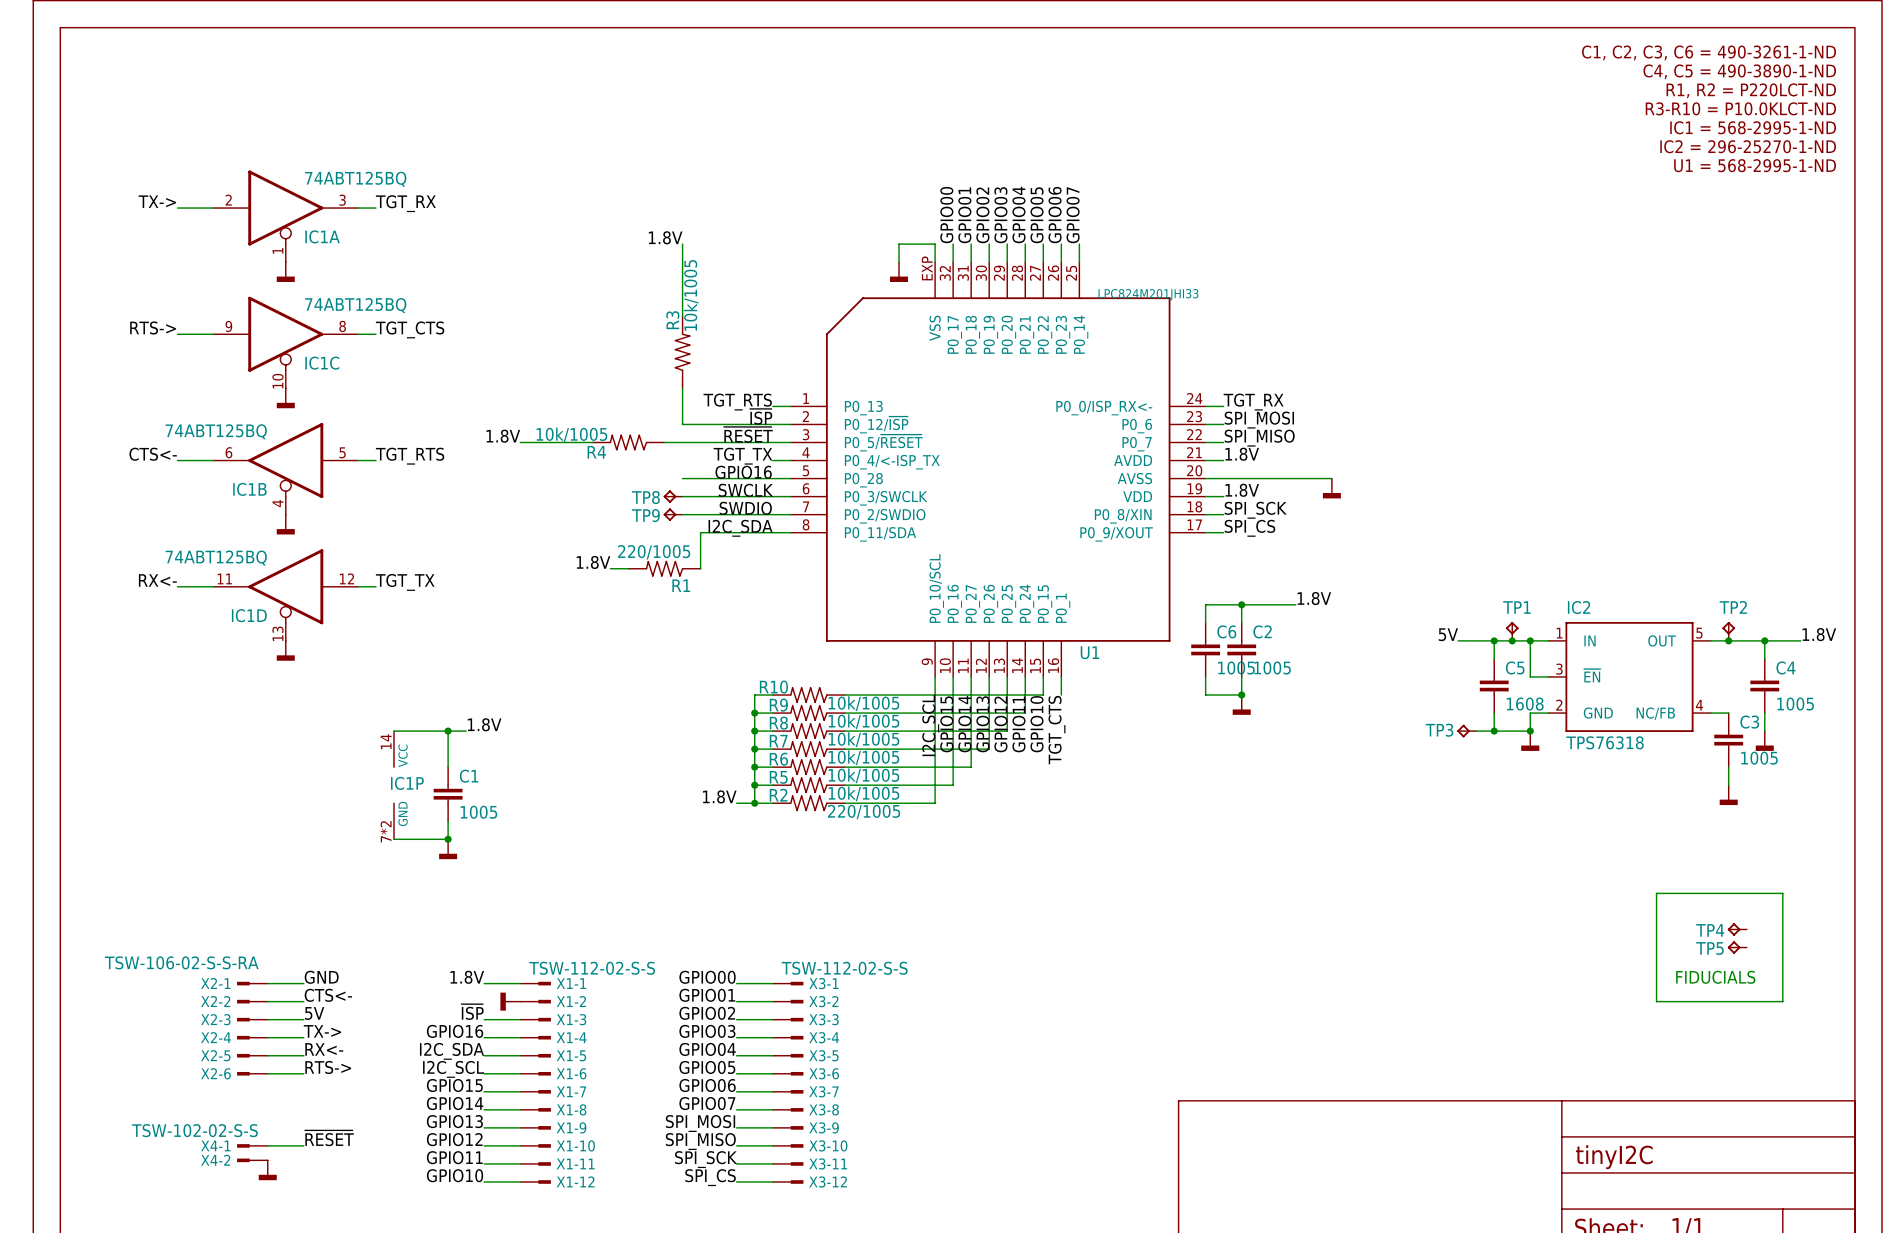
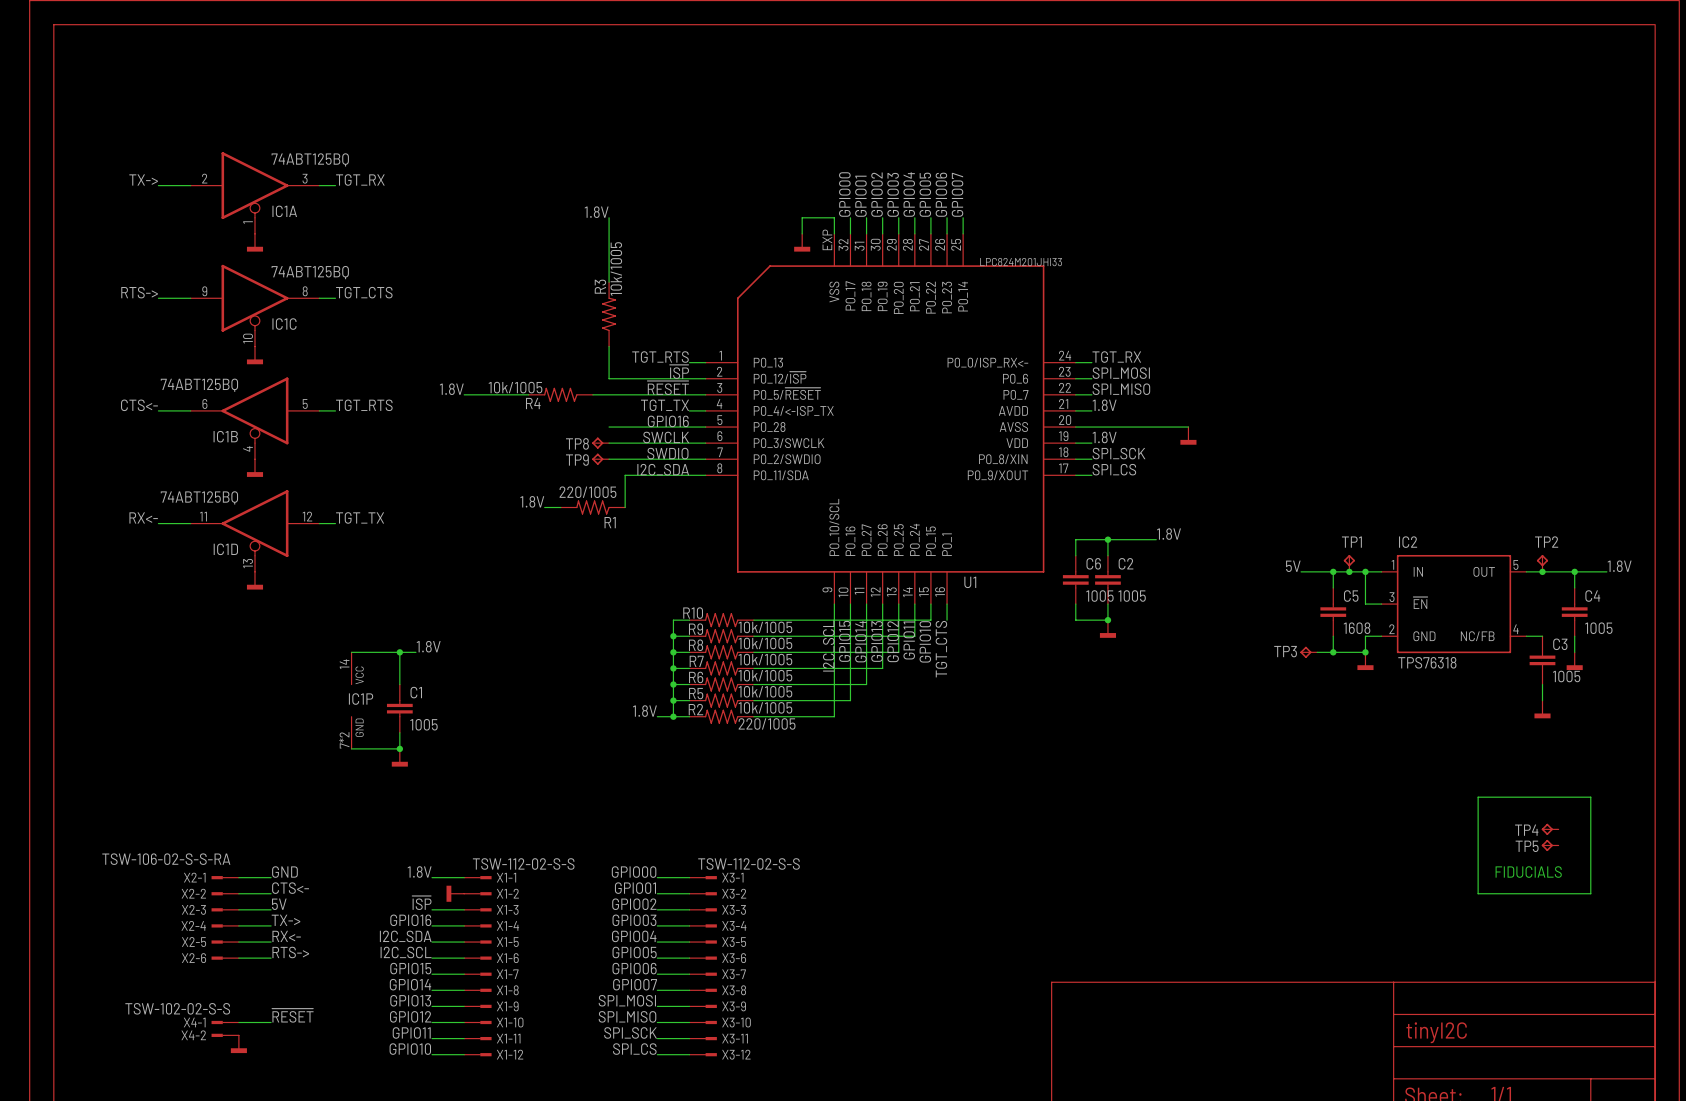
text: C1, C2, C3, C6 = 490-3261-1-ND (1709, 52) -> none
text: C4, C5 = 490-3890-1-ND (1739, 71) -> none
text: R1, R2 = P220LCT-ND (1751, 90) -> none
text: R3-R10 = P10.0KLCT-ND (1740, 108) -> none
text: IC1 = 568-2995-1-ND (1753, 127) -> none
text: IC2 = 296-25270-1-ND (1748, 146) -> none
text: U1 = 568-2995-1-ND (1755, 165) -> none

